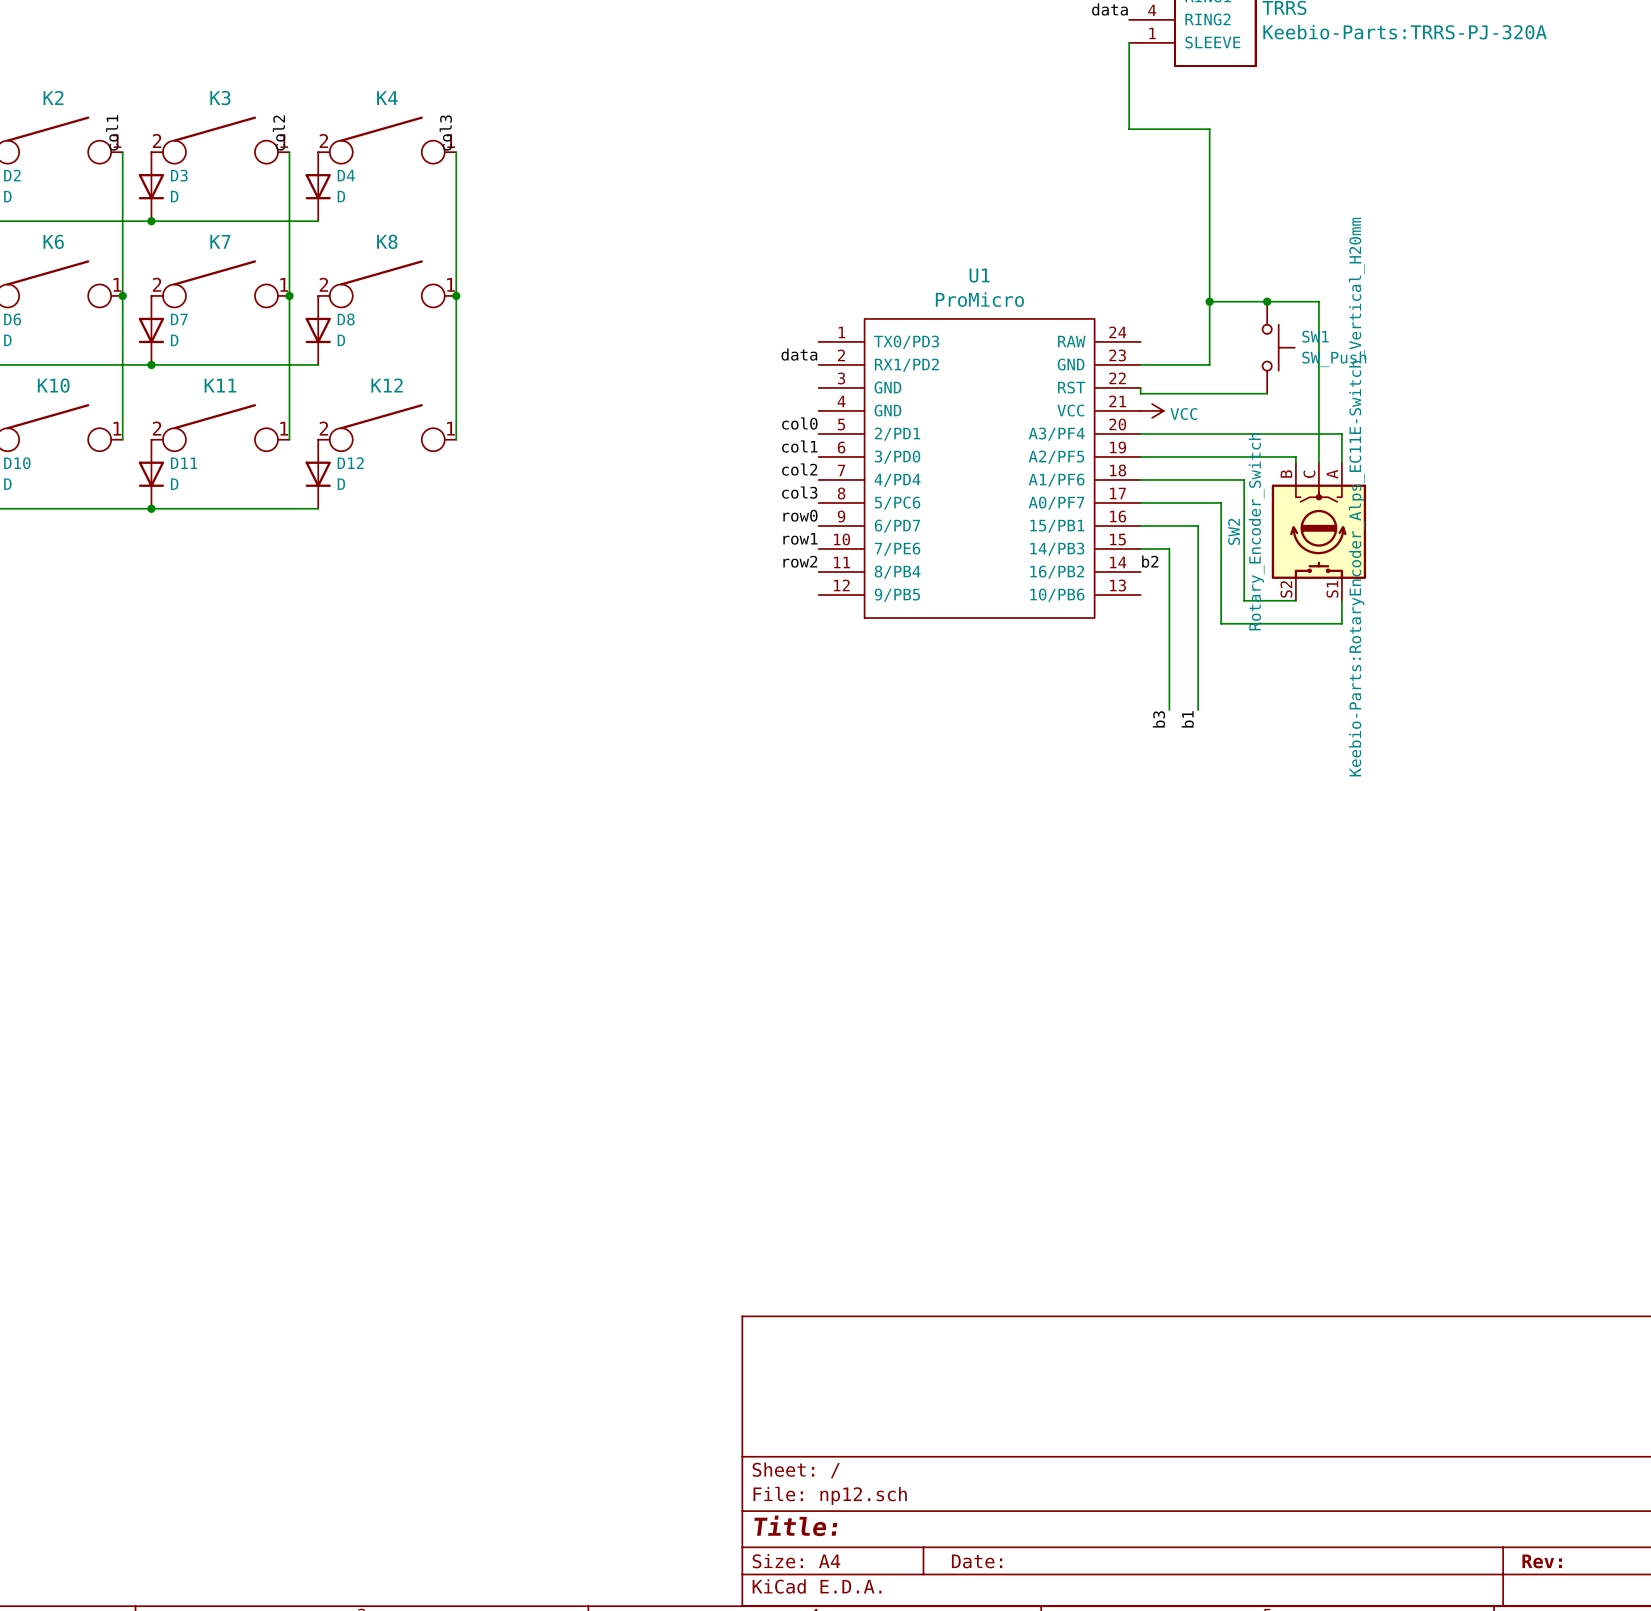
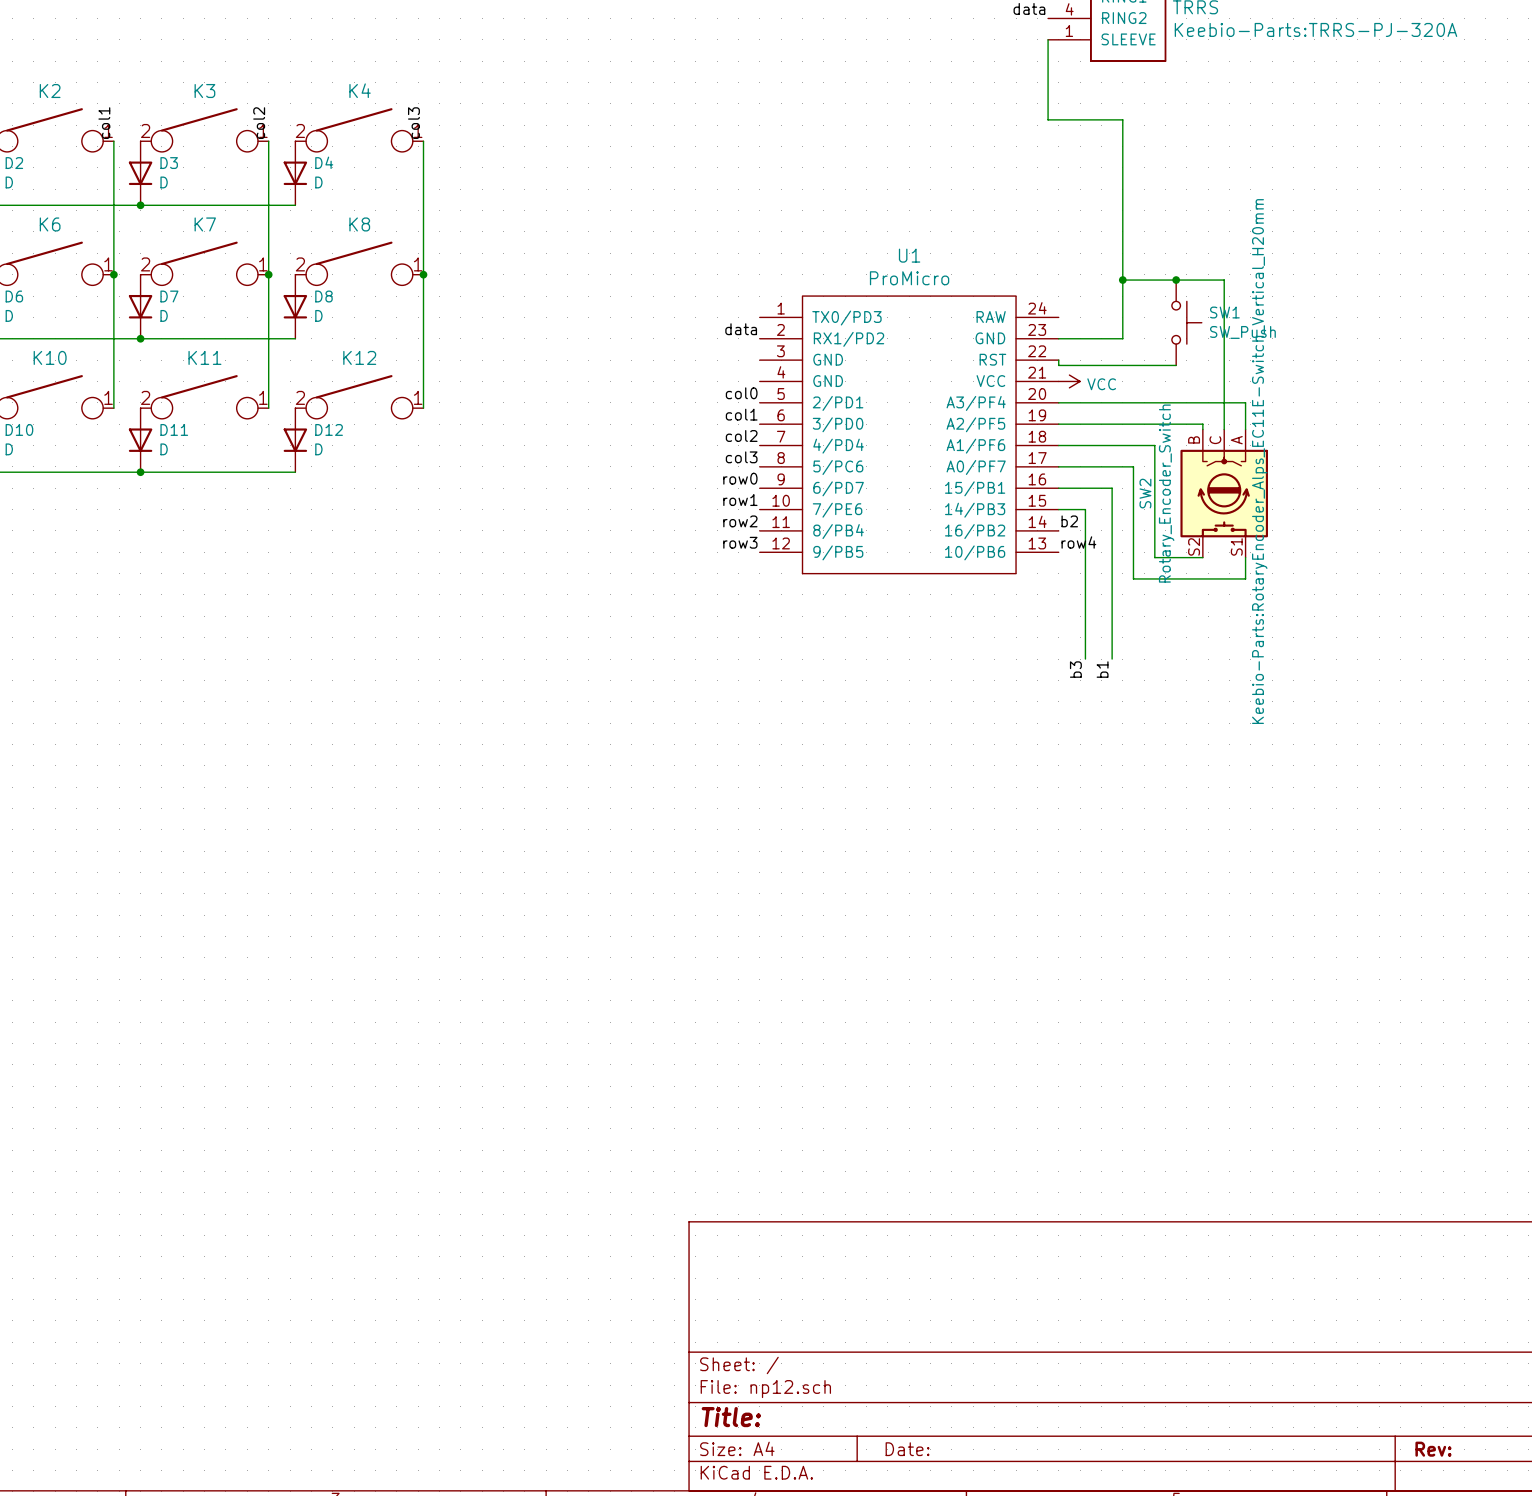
label: none -> row3 (740, 542)
label: none -> row4 (1078, 542)

